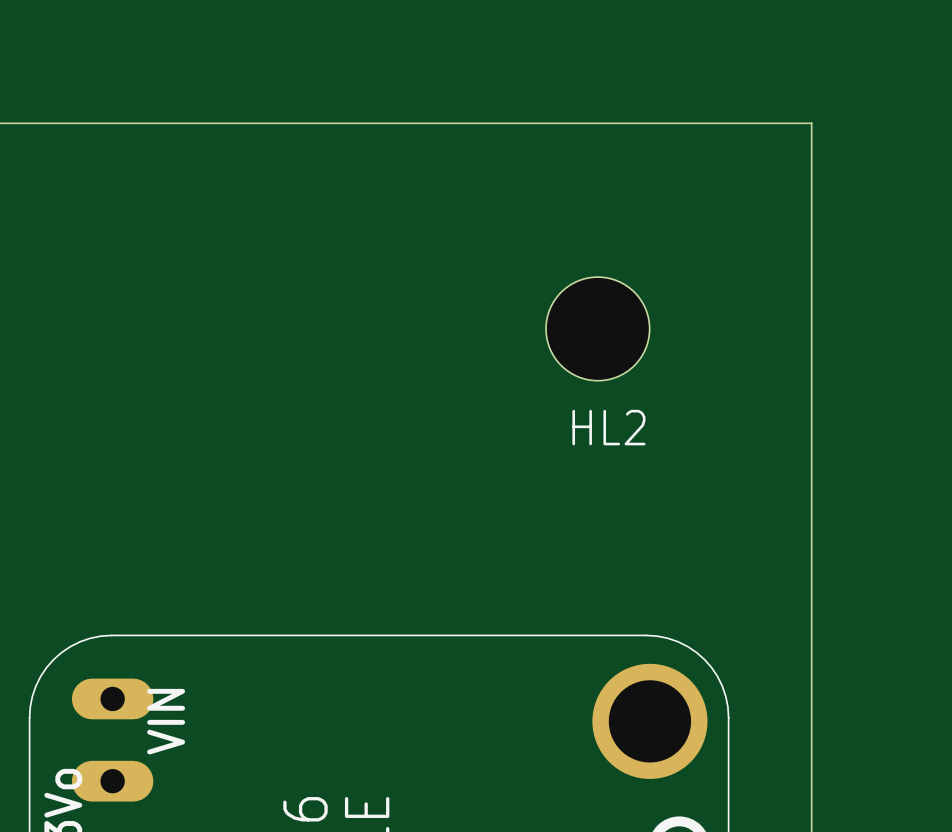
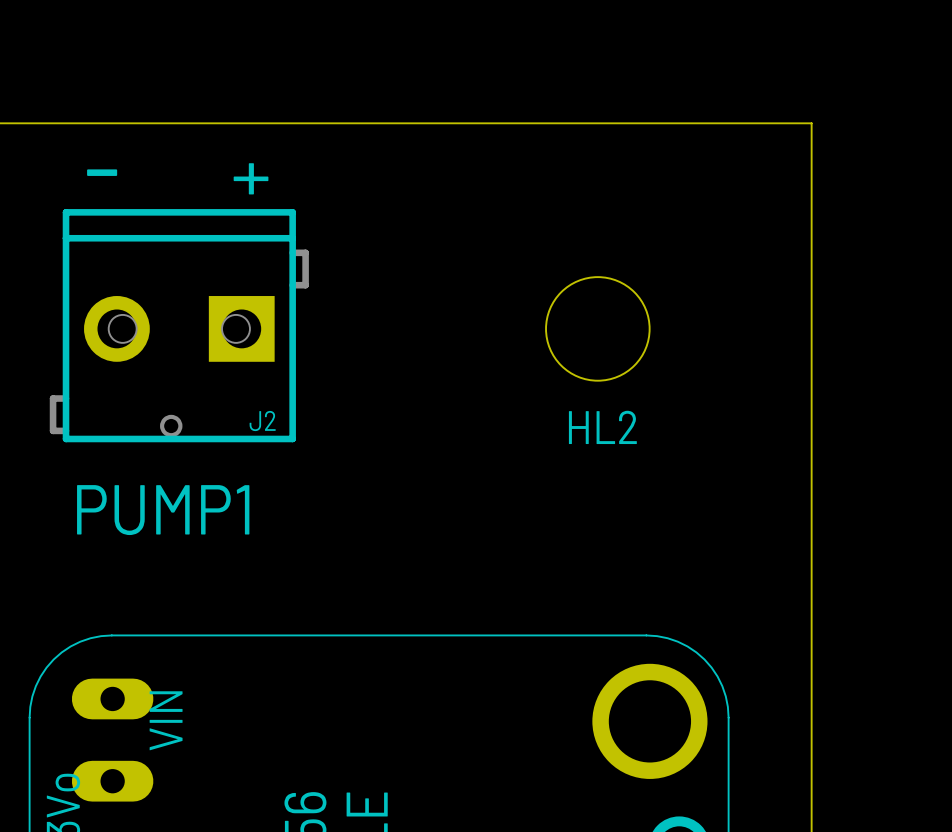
text: none -> + (251, 178)
text: none -> - (102, 172)
J2: none -> (179, 325)
text: none -> PUMP1 (163, 510)

